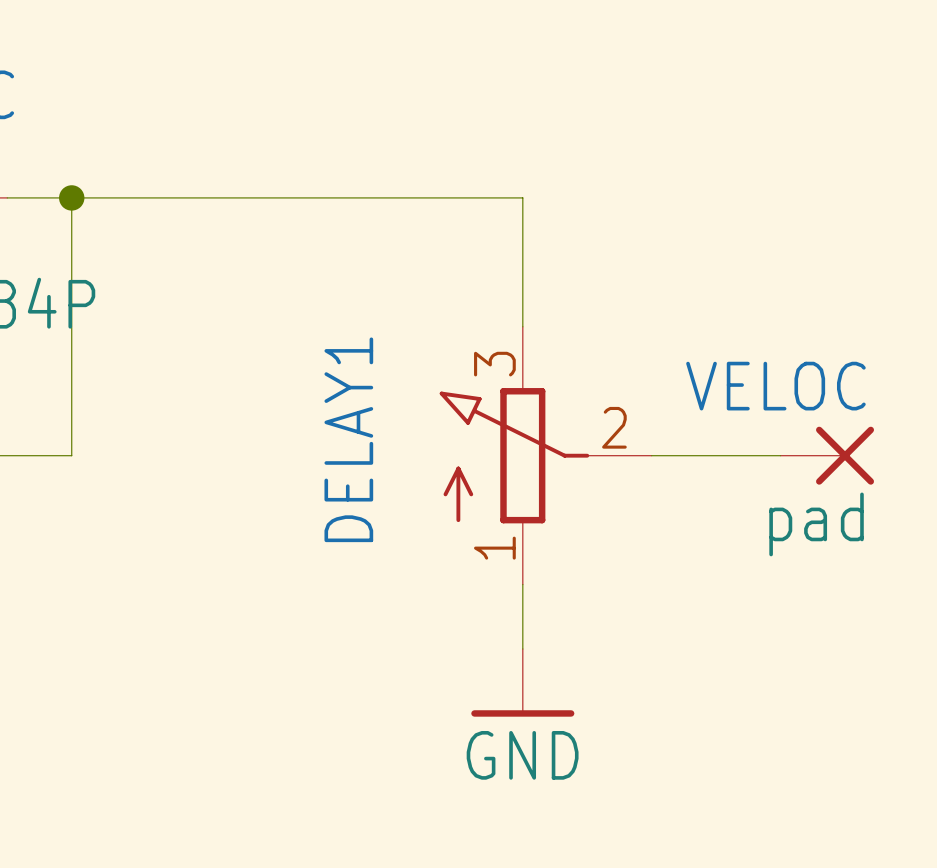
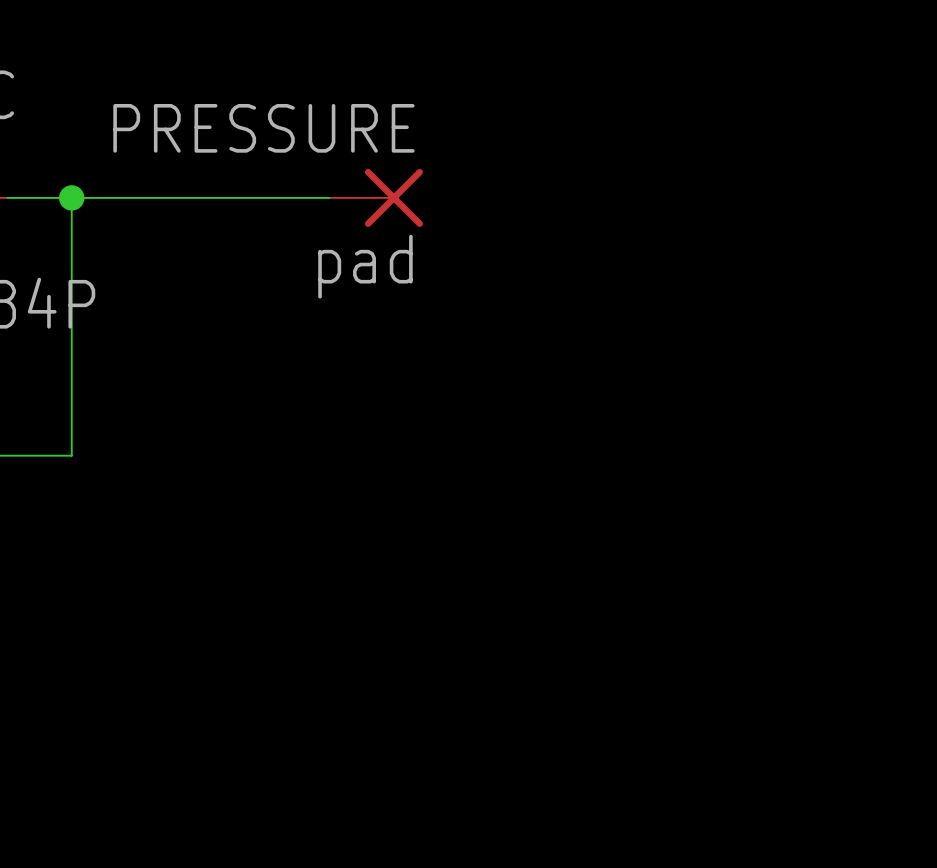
wire: (329, 197) (522, 197) (522, 326) -> none
PRESSURE: none -> pad (376, 197)
DELAY1: (545, 455) -> none
wire: (651, 455) (780, 455) -> none
VELOC: pad (827, 455) -> none
wire: (522, 584) (522, 649) -> none
power symbol: GND (522, 682) -> none

